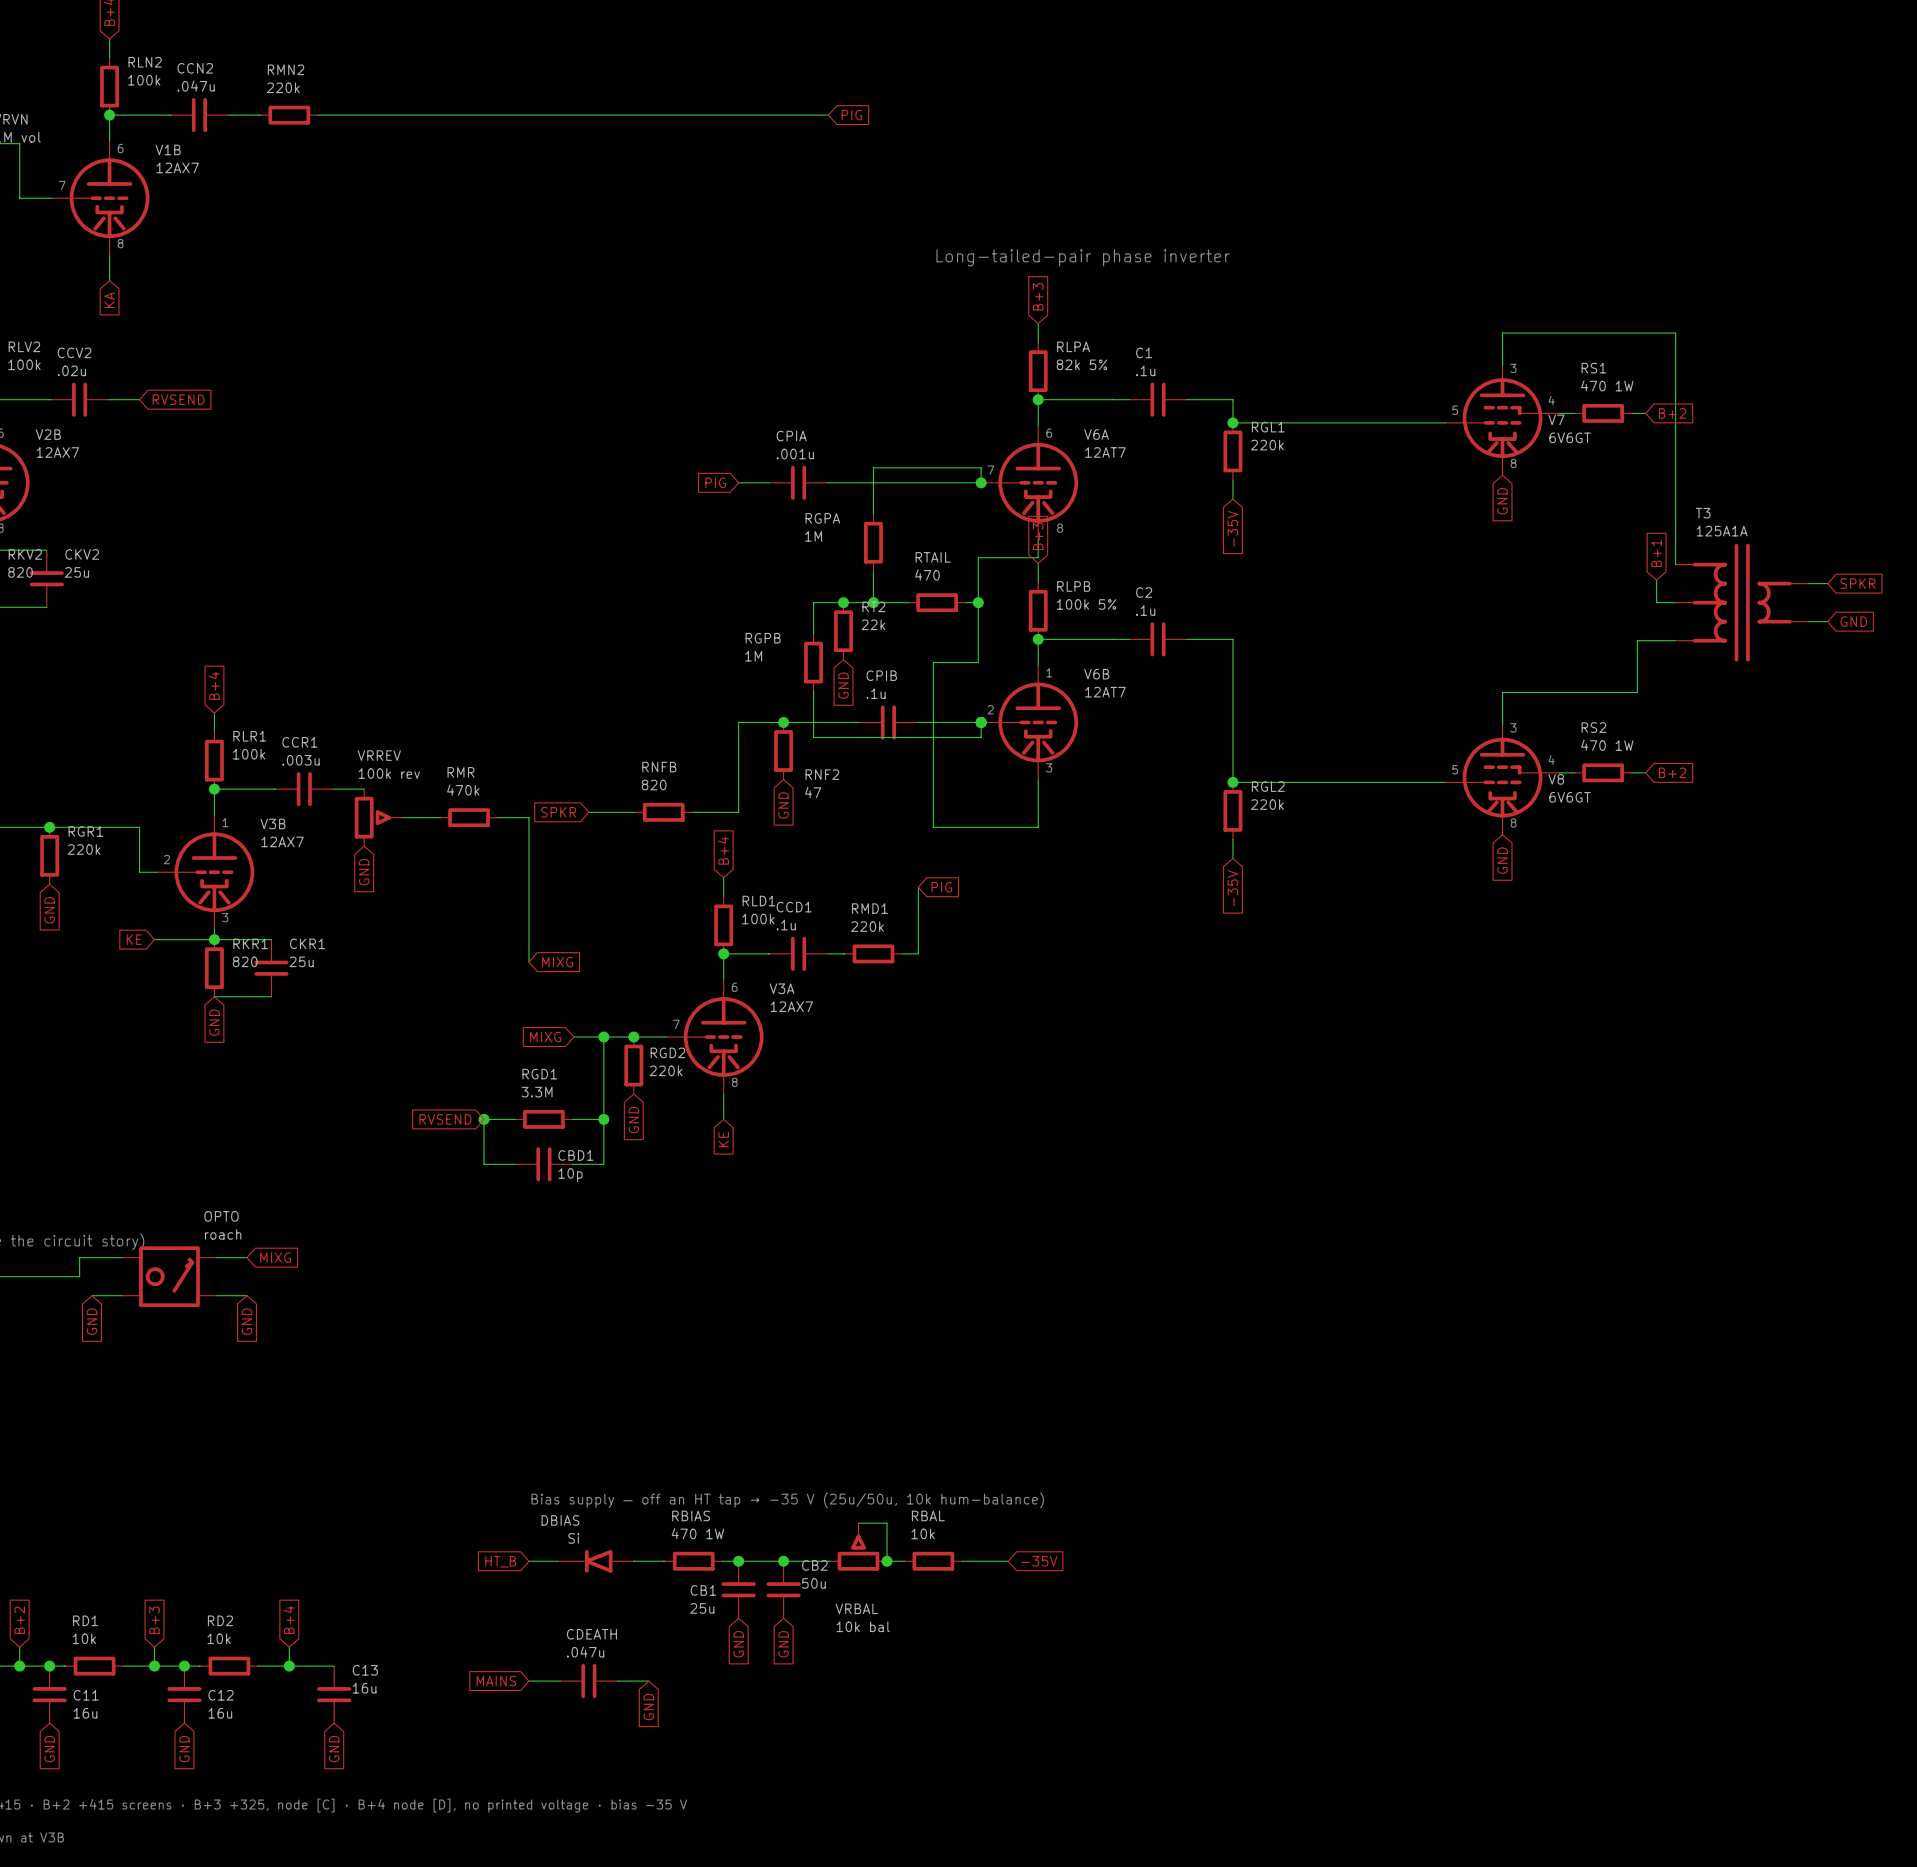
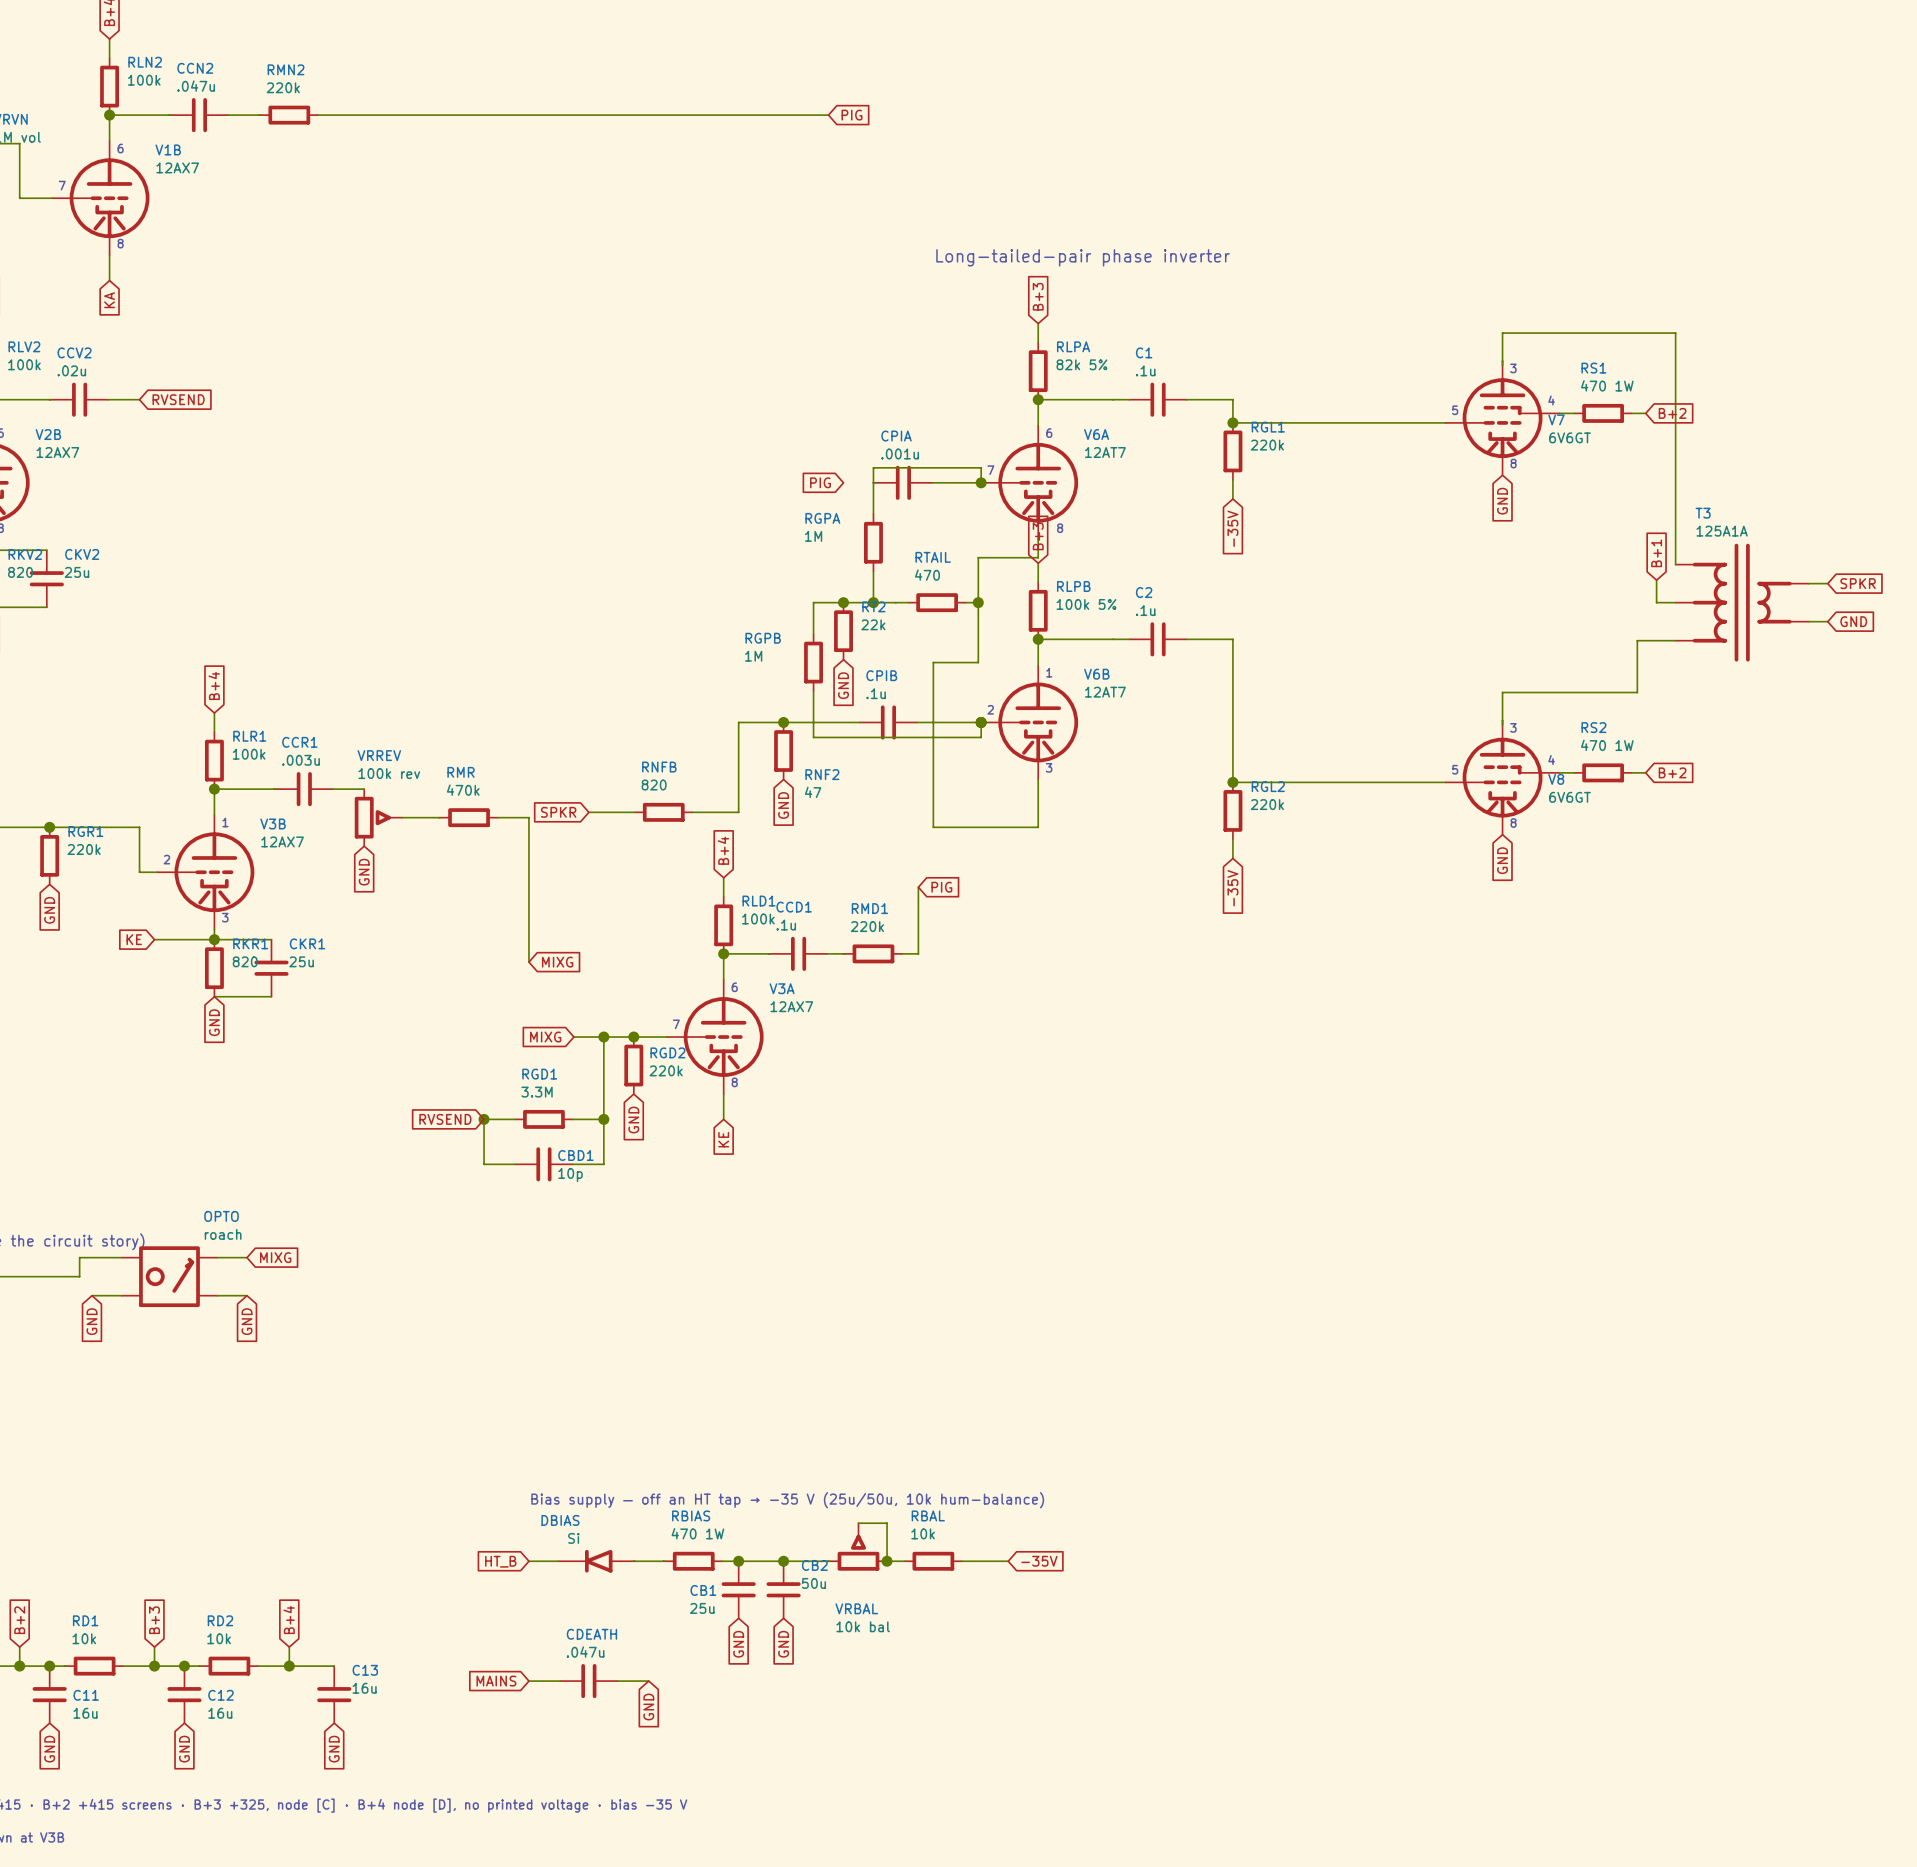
global label position: PIG (715, 482) -> PIG (820, 482)
wire: (738, 482) (770, 482) -> none
CPIA position: (798, 482) -> (903, 482)
wire: (827, 482) (873, 482) -> none

